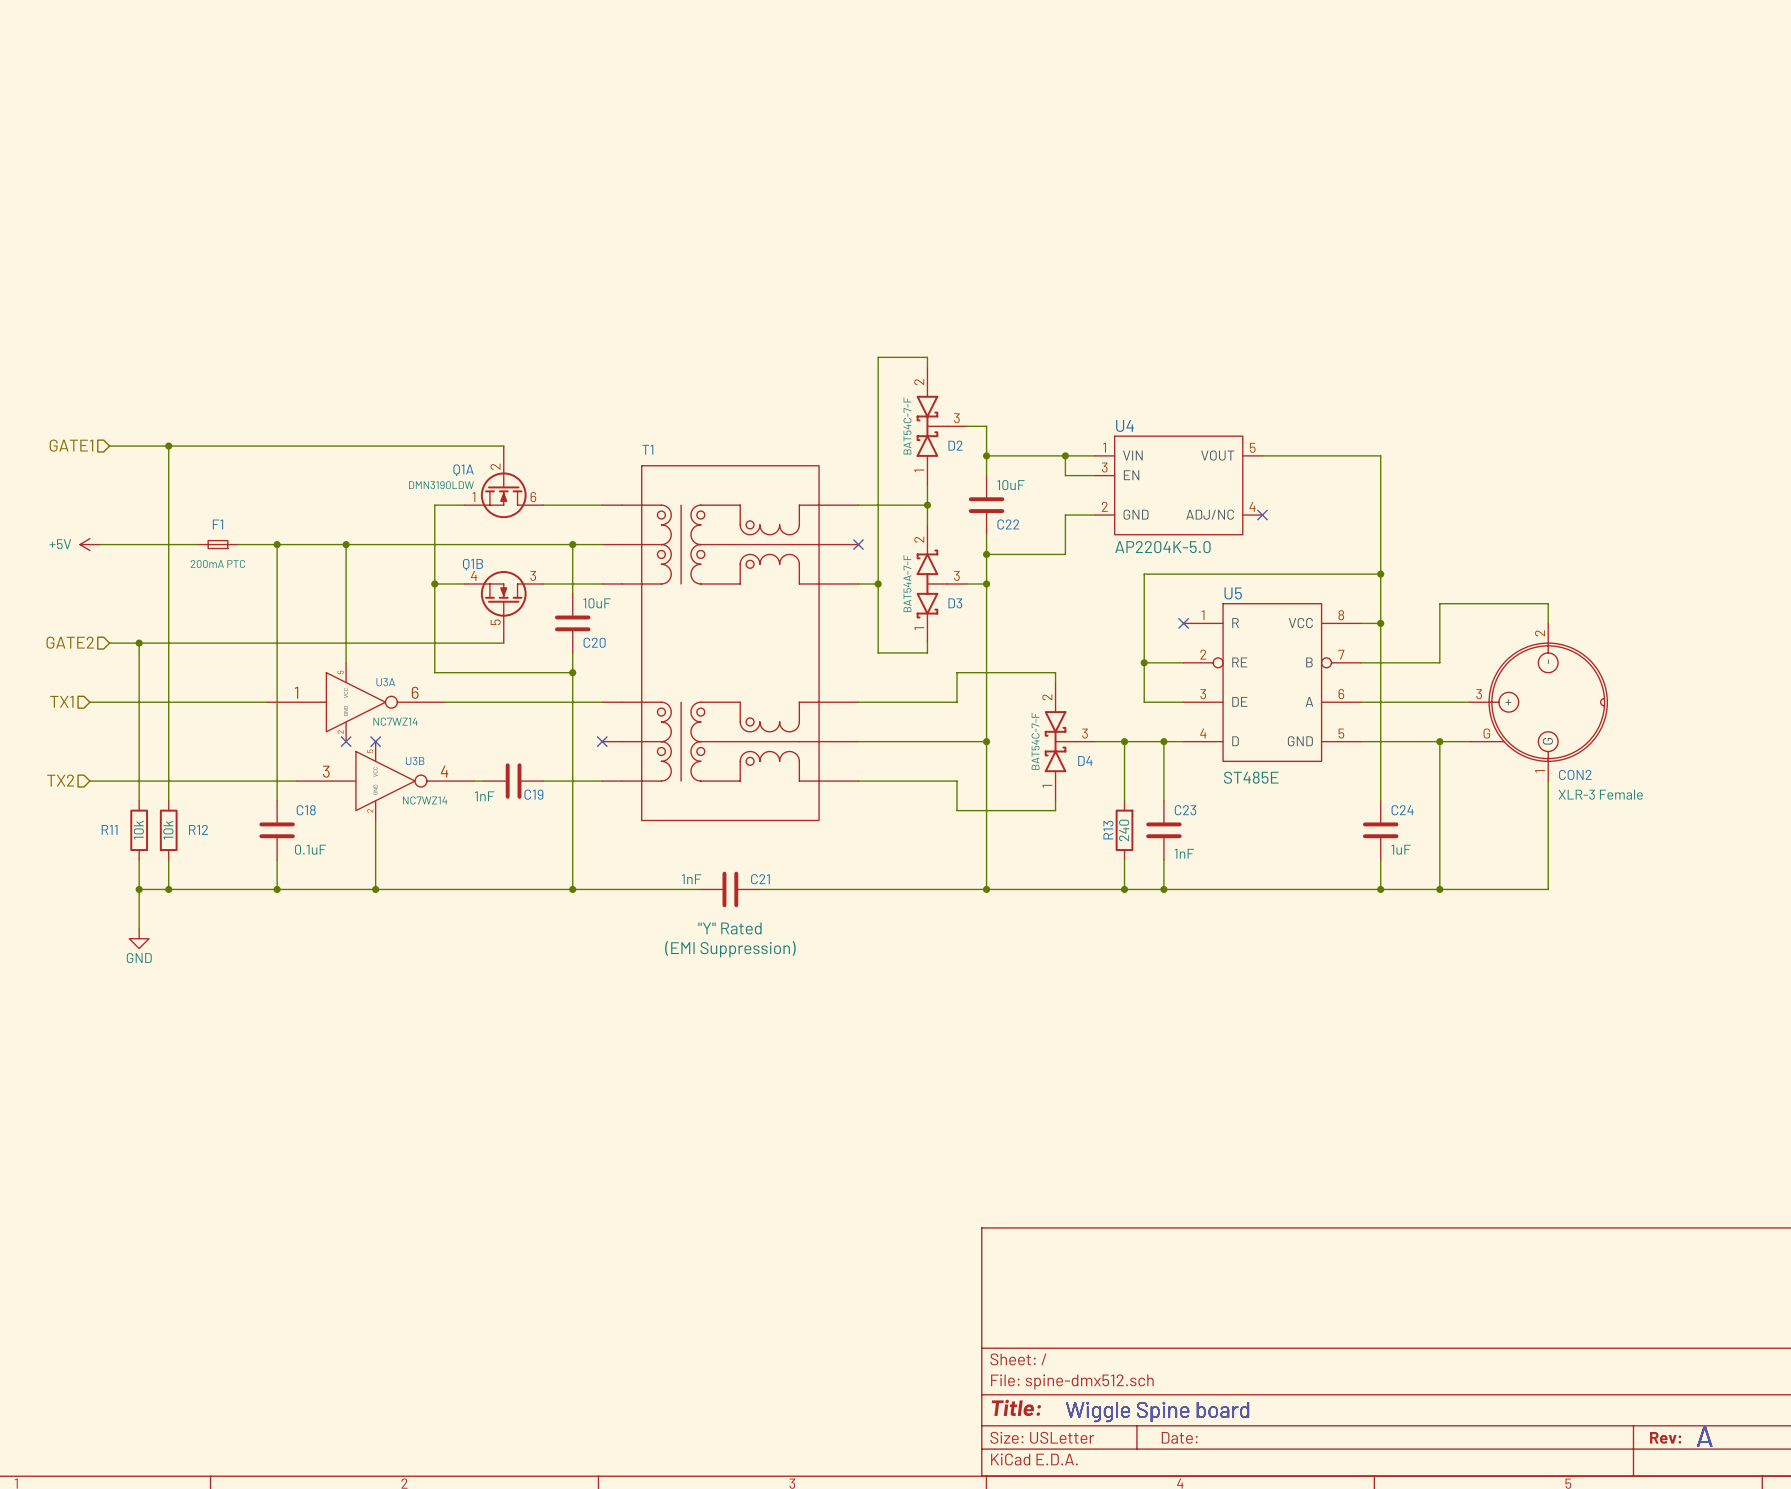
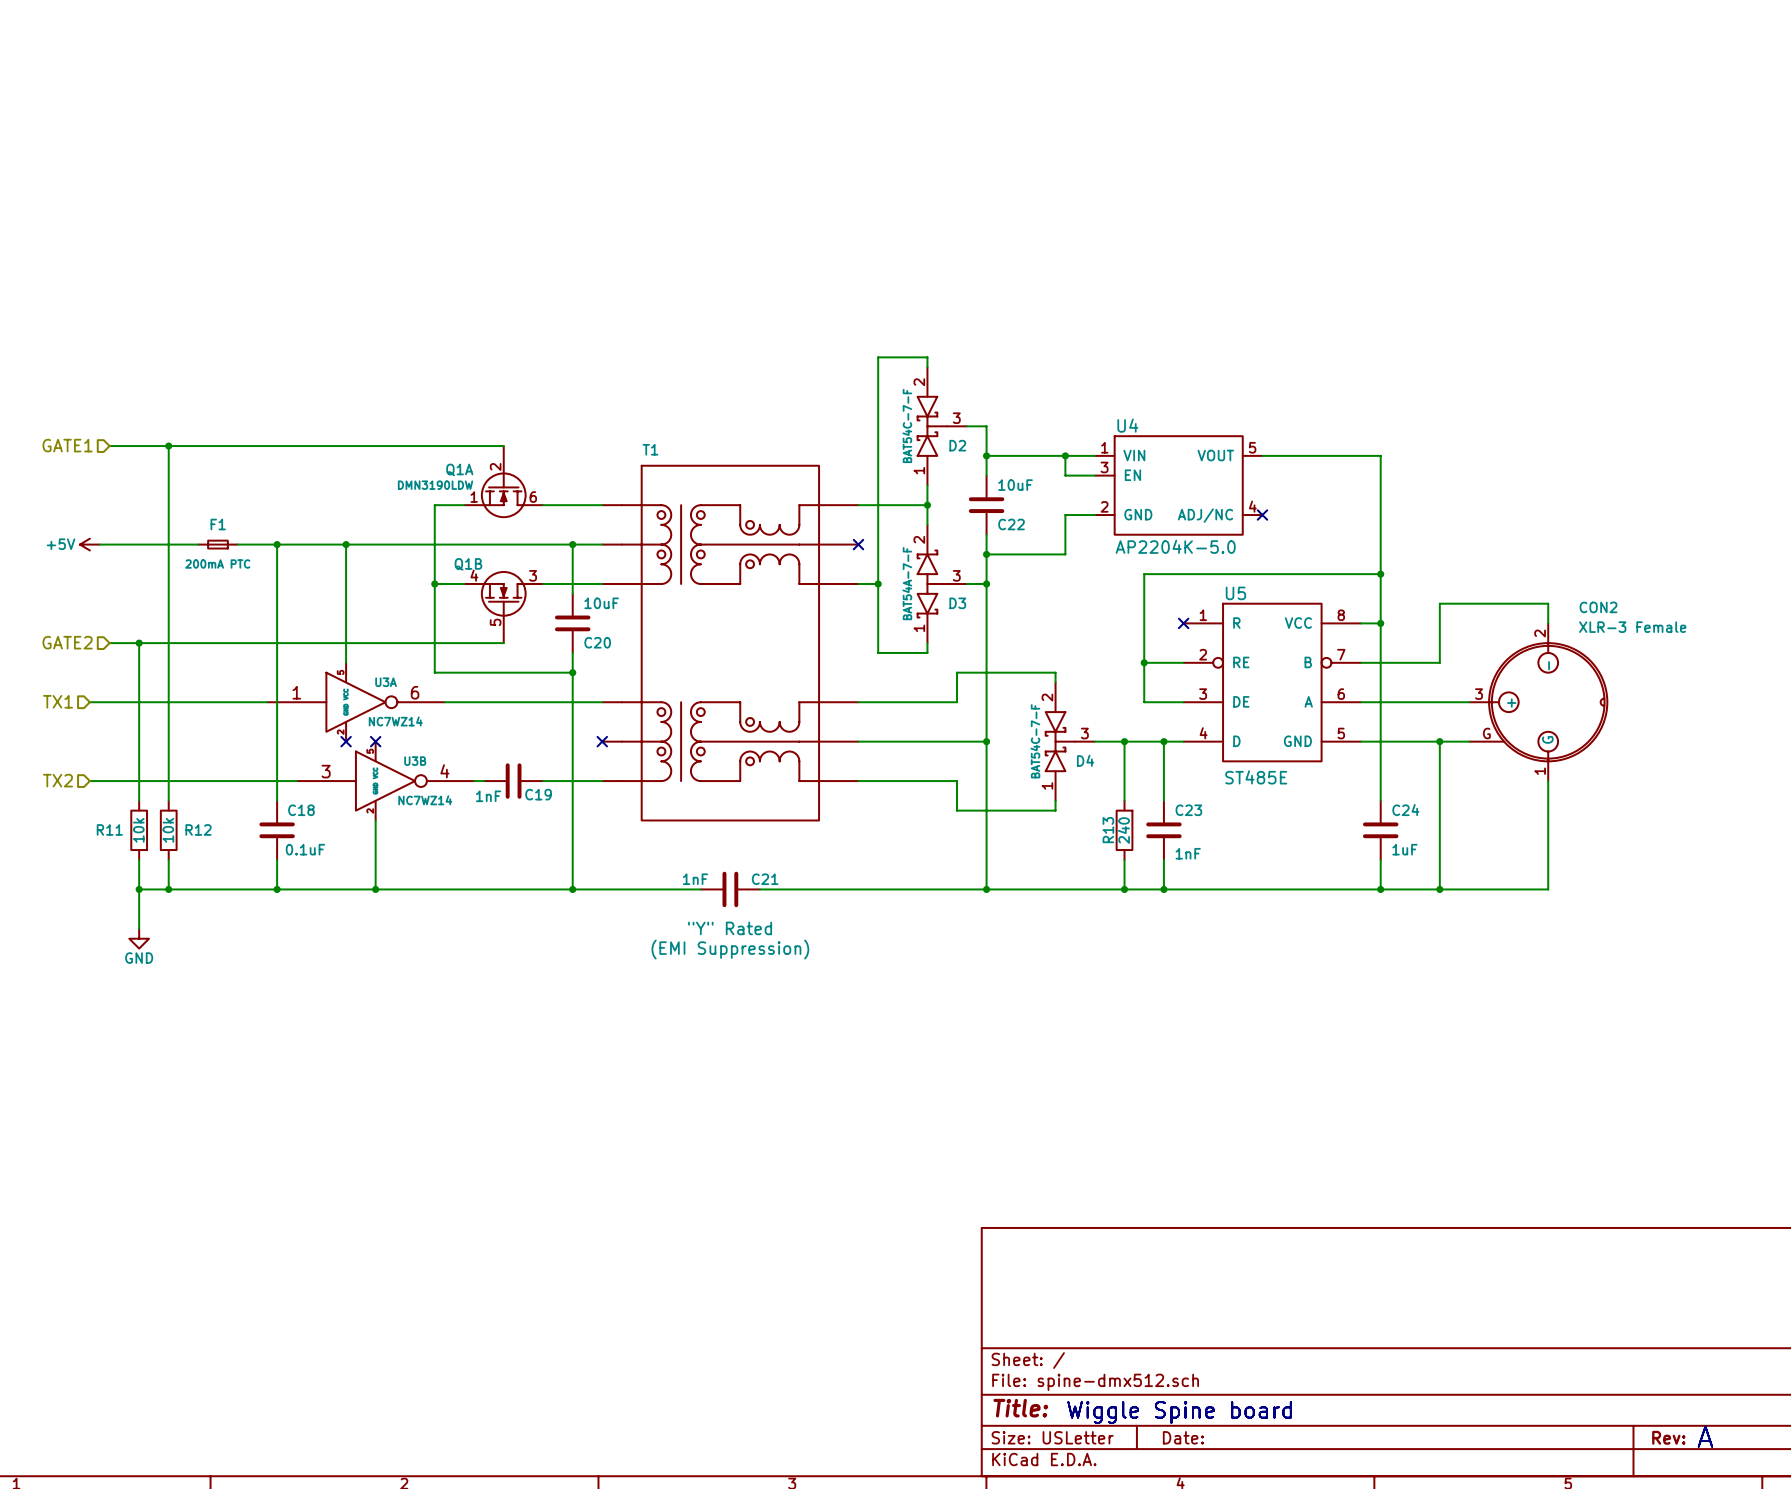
CON2 name position: CON2 (1575, 774) -> CON2 (1598, 607)
CON2 value position: XLR-3 Female (1600, 794) -> XLR-3 Female (1632, 627)

